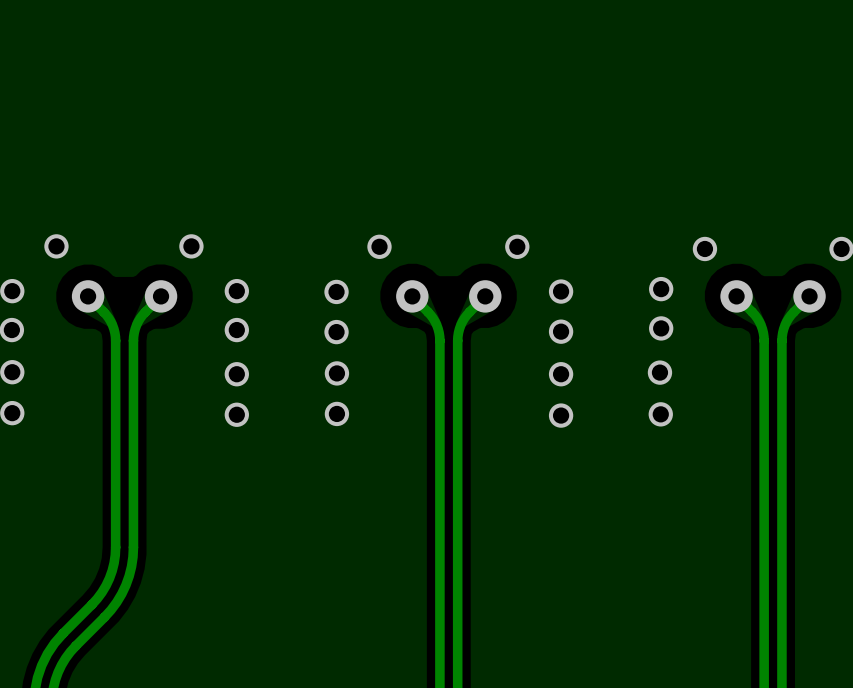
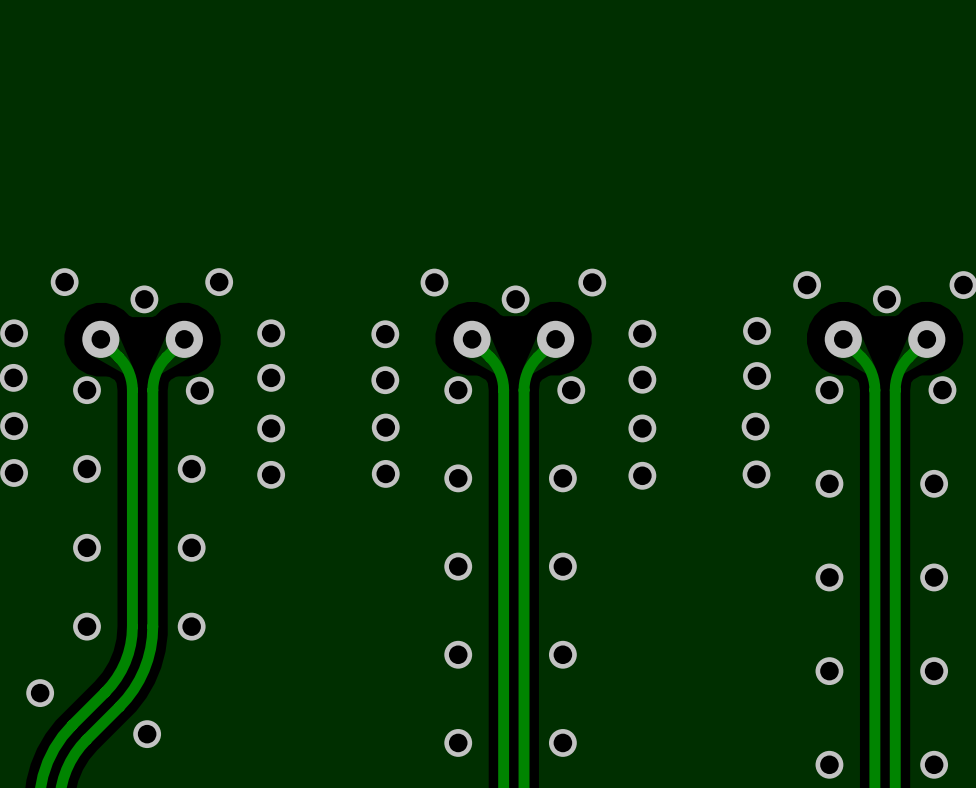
via: none -> (144, 299)
via: none -> (515, 299)
via: none -> (886, 299)
via: none -> (86, 390)
via: none -> (458, 390)
via: none -> (571, 390)
via: none -> (829, 390)
via: none -> (942, 390)
via: none -> (199, 390)
via: none -> (86, 468)
via: none -> (191, 468)
via: none -> (458, 478)
via: none -> (562, 478)
via: none -> (829, 483)
via: none -> (934, 483)
via: none -> (86, 547)
via: none -> (191, 547)
via: none -> (458, 566)
via: none -> (562, 566)
via: none -> (829, 577)
via: none -> (934, 577)
via: none -> (86, 626)
via: none -> (191, 626)
via: none -> (458, 654)
via: none -> (562, 654)
via: none -> (829, 671)
via: none -> (934, 671)
via: none -> (40, 693)
via: none -> (147, 734)
via: none -> (458, 742)
via: none -> (562, 742)
via: none -> (829, 764)
via: none -> (934, 764)

